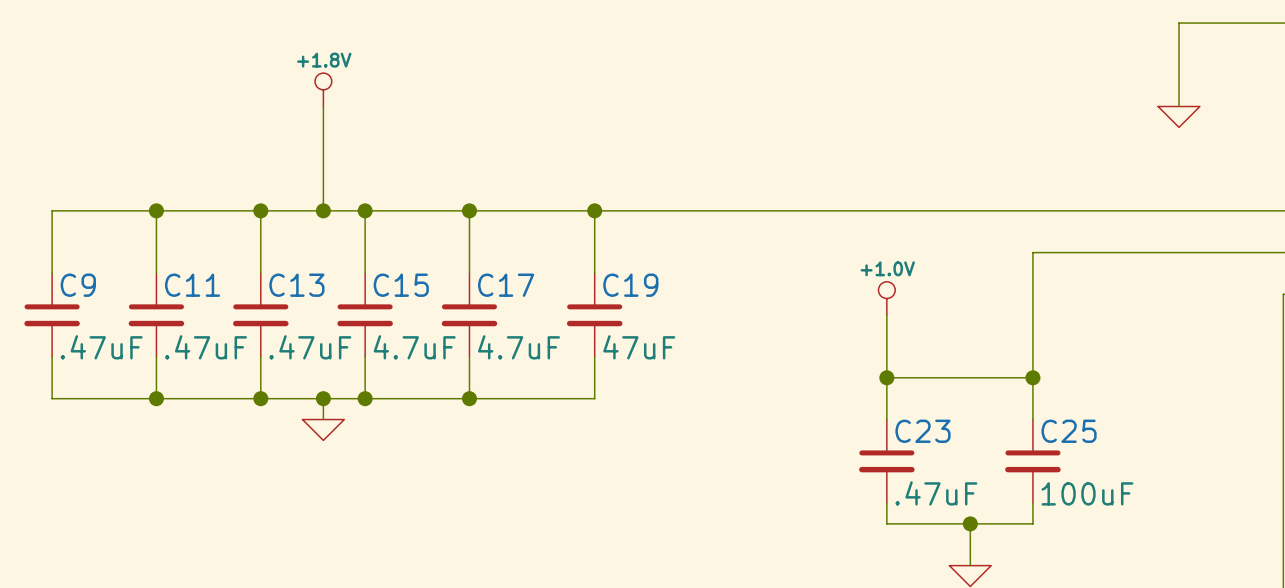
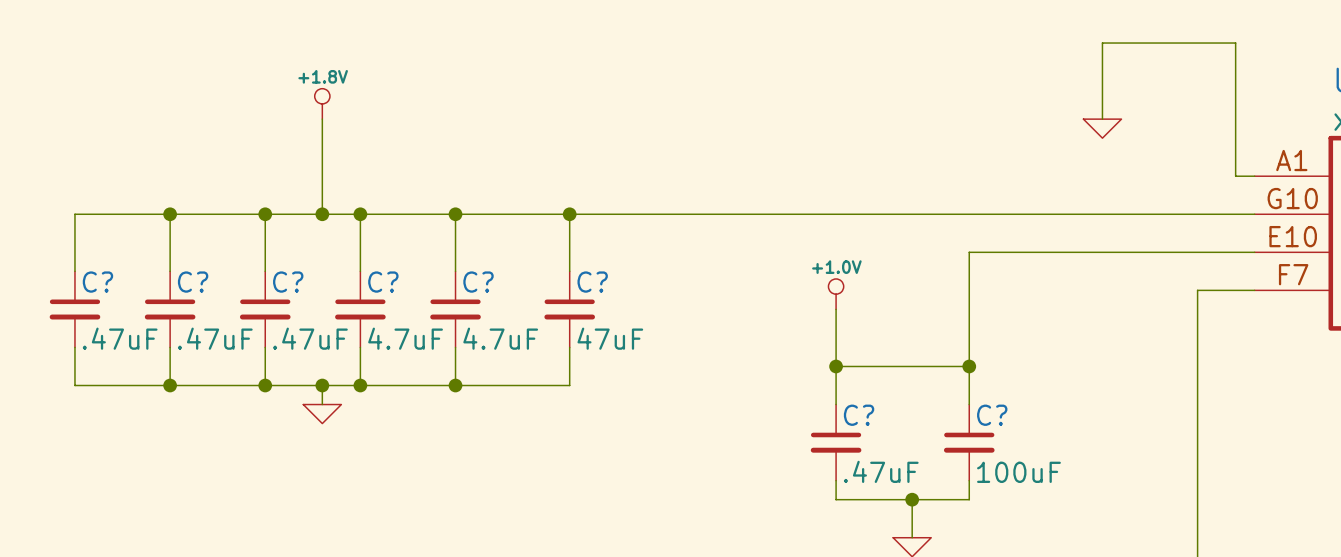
C9 name: C9 (78, 285) -> C? (97, 282)
C11 name: C11 (192, 285) -> C? (193, 282)
C13 name: C13 (296, 285) -> C? (288, 282)
C15 name: C15 (401, 285) -> C? (383, 282)
C17 name: C17 (506, 285) -> C? (478, 282)
C19 name: C19 (630, 285) -> C? (592, 282)
C23 name: C23 (922, 431) -> C? (859, 415)
C25 name: C25 (1069, 431) -> C? (992, 415)

